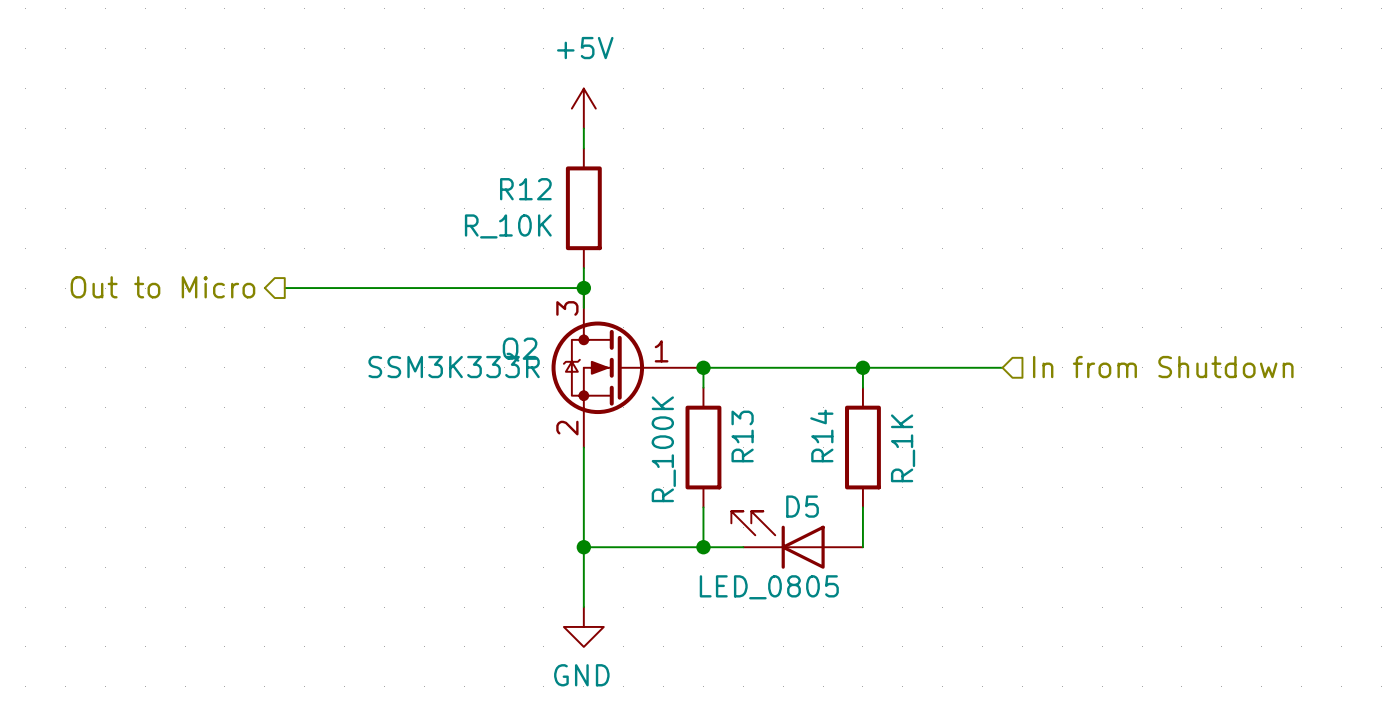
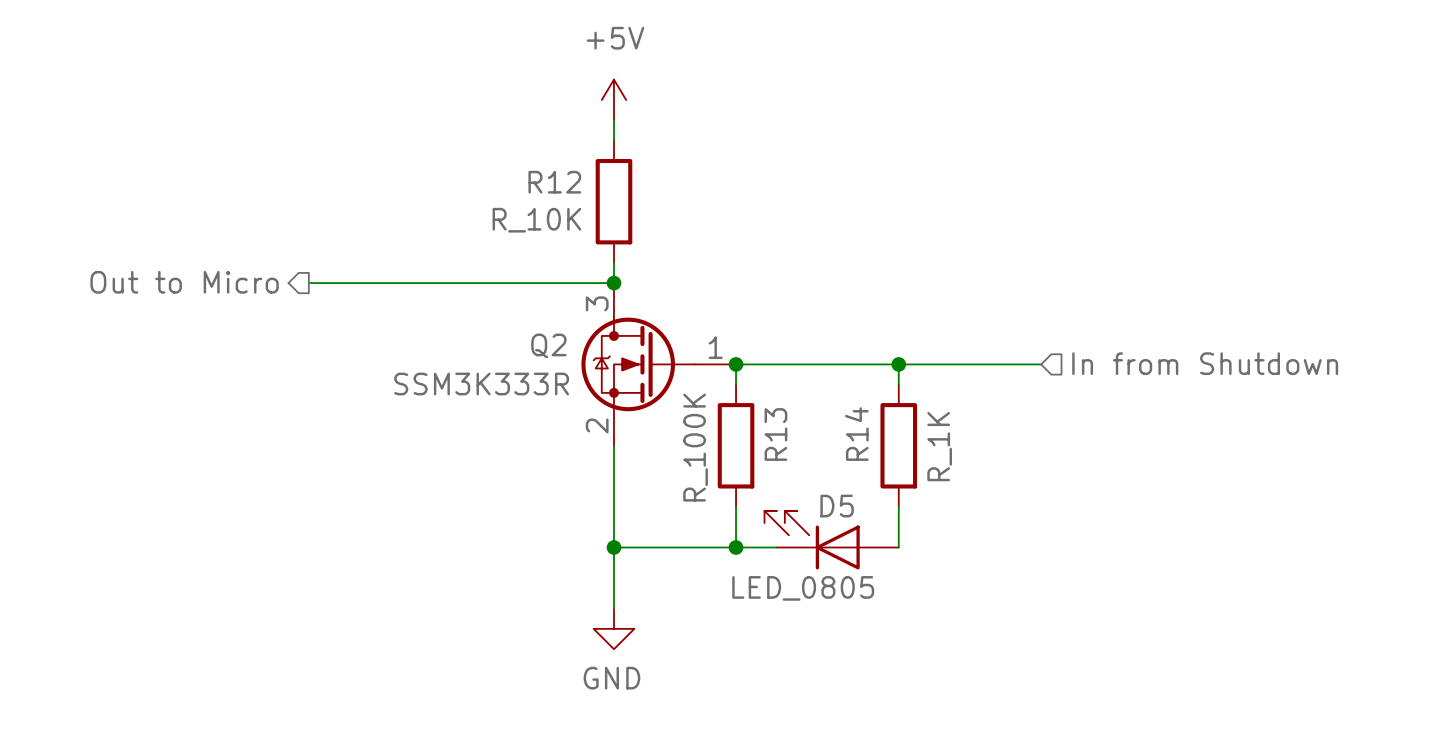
Q2 symbol: [551, 288, 704, 448] -> [581, 283, 737, 446]

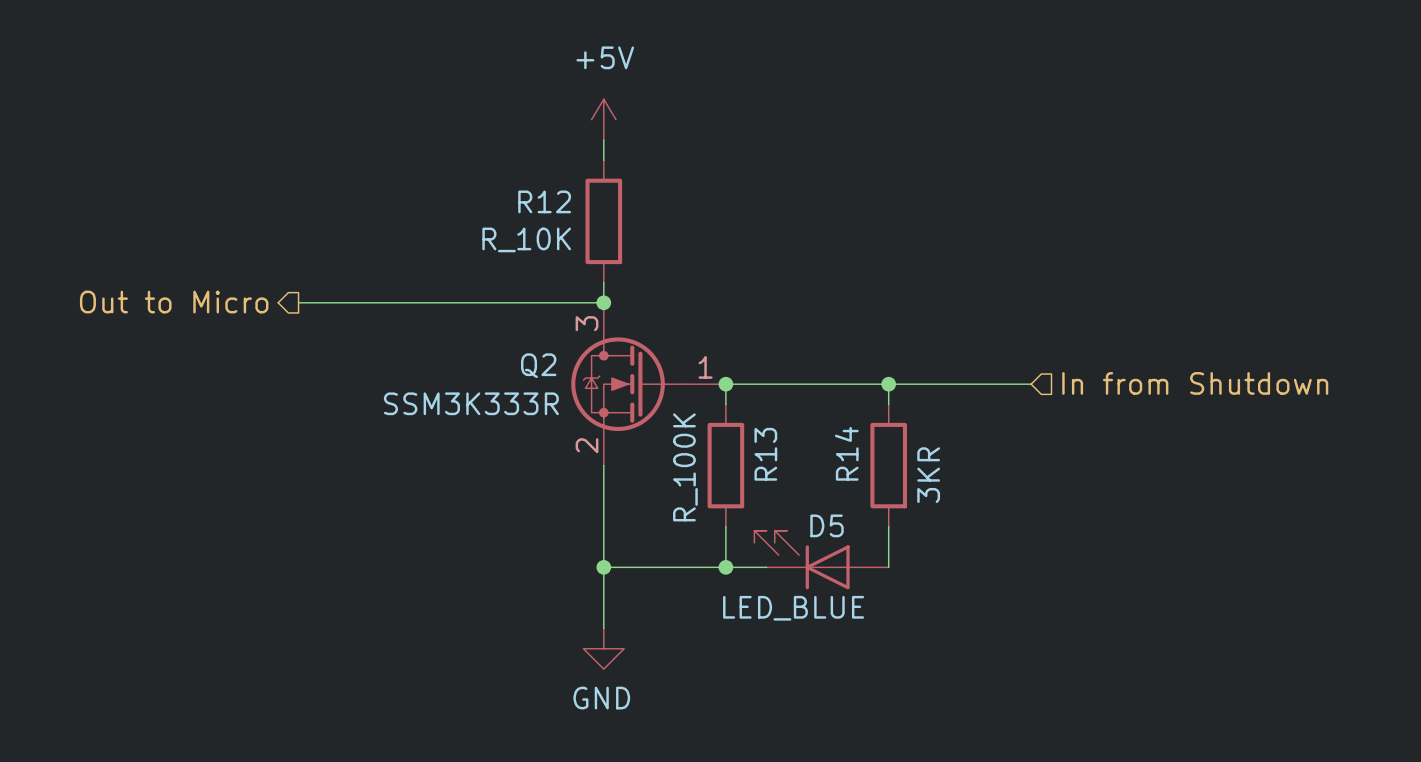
R14 value: R_1K (939, 446) -> 3KR (928, 475)
D5 value: LED_0805 (803, 588) -> LED_BLUE (793, 608)

